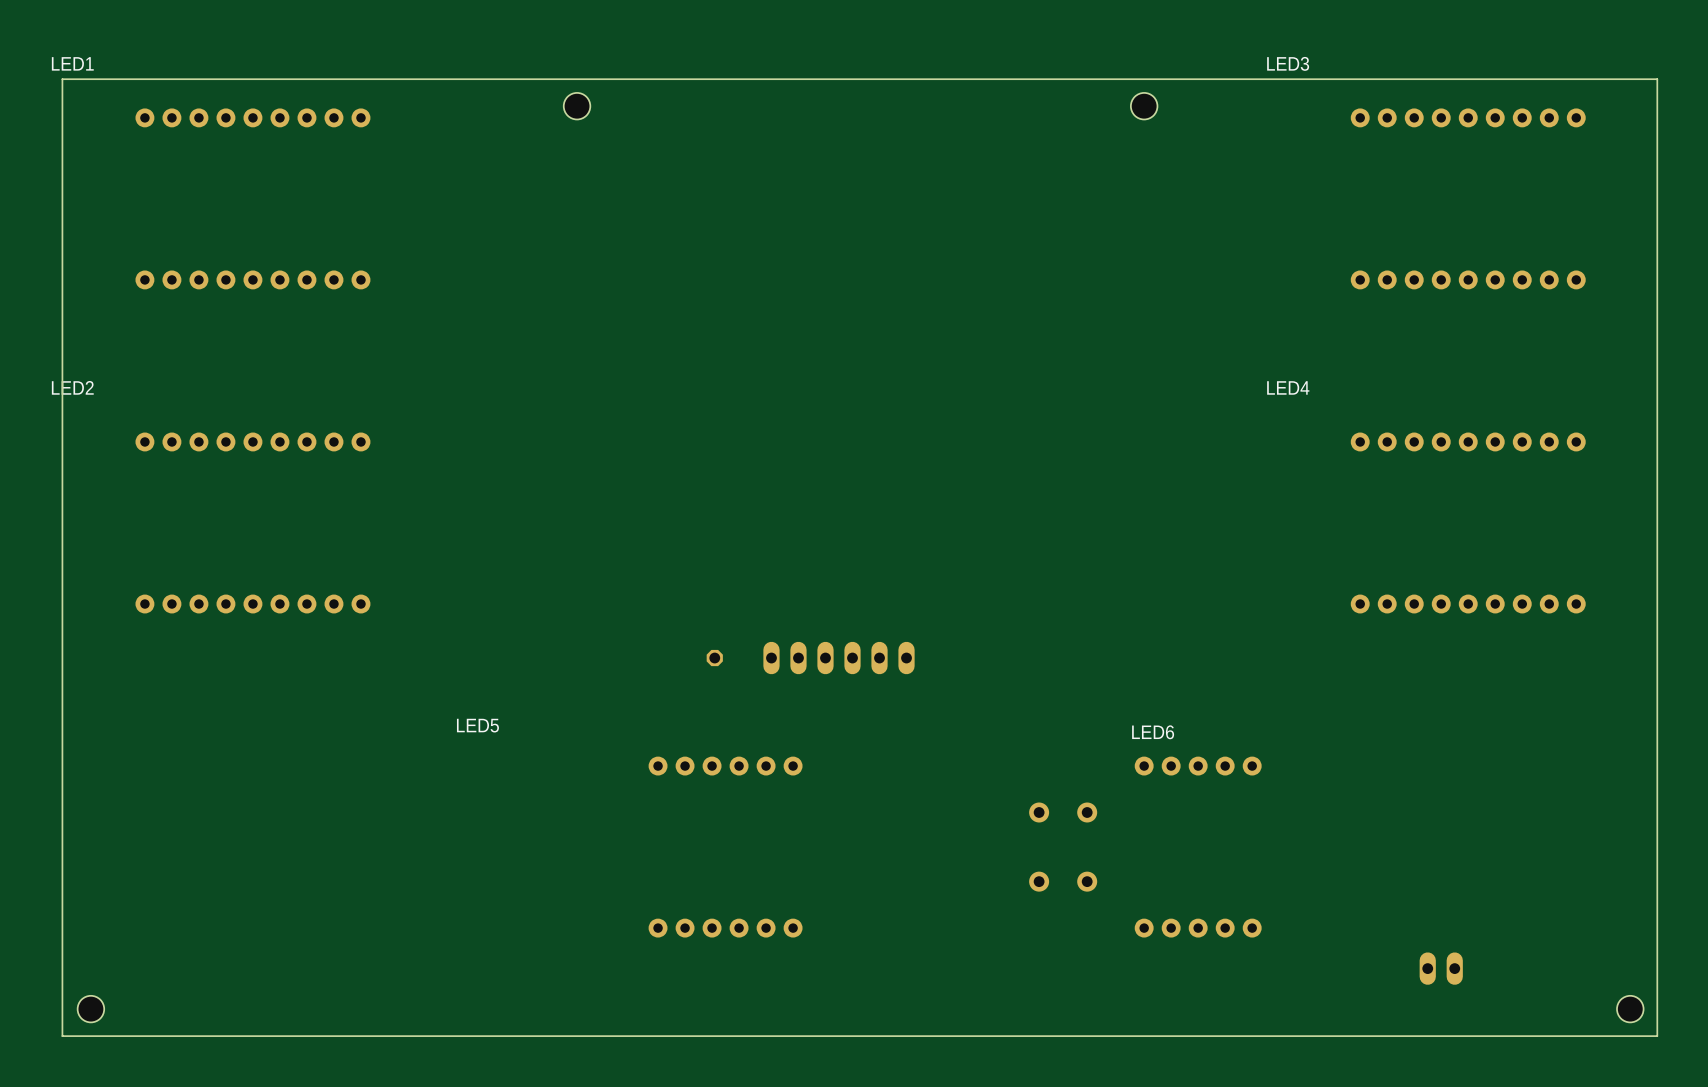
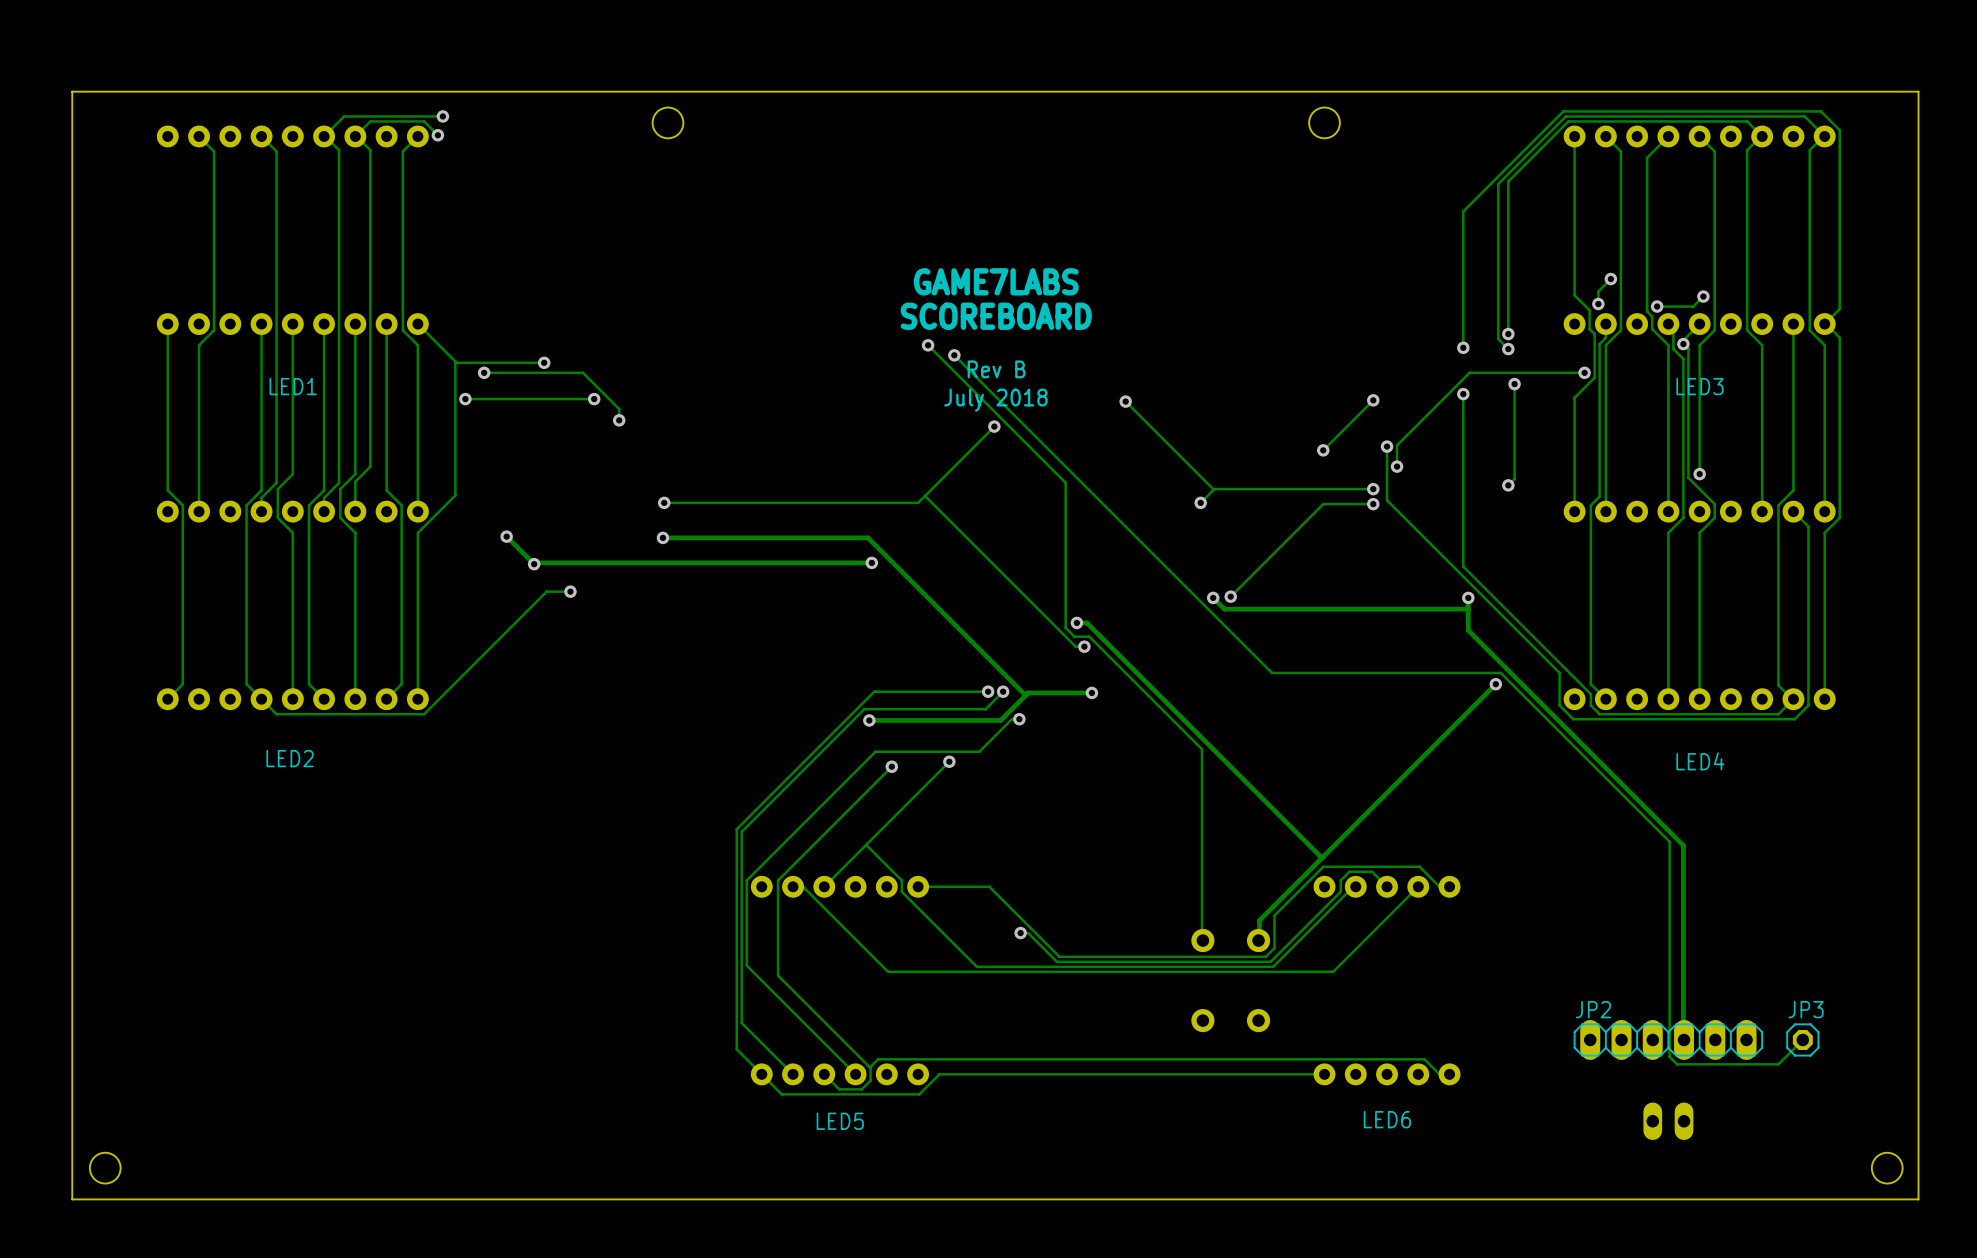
LED1 name position: LED1 (72, 63) -> LED1 (293, 386)
LED3 name position: LED3 (1288, 63) -> LED3 (1699, 386)
track: none -> (442, 116) (344, 116) (324, 136) (339, 150) (339, 482) (324, 497) (324, 511)
via: none -> (442, 116)
track: none -> (437, 135) (424, 121) (370, 121) (355, 136) (370, 150) (370, 466) (355, 481) (355, 511)
via: none -> (437, 135)
track: none -> (199, 136) (214, 151) (214, 330) (199, 345) (199, 511)
track: none -> (261, 136) (276, 151) (276, 482) (261, 497) (261, 511)
track: none -> (417, 136) (402, 151) (402, 330) (417, 345) (417, 511)
track: none -> (1574, 136) (1574, 295) (1589, 310) (1589, 329) (1594, 334) (1594, 377) (1574, 397) (1574, 511)
track: none -> (1605, 136) (1620, 151) (1620, 330) (1605, 345) (1605, 511)
track: none -> (1668, 136) (1647, 157) (1647, 311) (1652, 316) (1652, 329) (1668, 345) (1668, 511)
track: none -> (1699, 136) (1714, 151) (1714, 330) (1699, 345) (1699, 474)
track: none -> (1610, 279) (1598, 291) (1598, 304)
via: none -> (1610, 279)
text: none -> GAME7LABS (996, 281)
track: none -> (1703, 296) (1693, 306) (1657, 306)
via: none -> (1703, 296)
via: none -> (1598, 304)
via: none -> (1657, 306)
text: none -> SCOREBOARD (996, 316)
track: none -> (167, 324) (167, 490) (182, 505) (182, 684) (167, 699)
track: none -> (261, 324) (261, 490) (246, 505) (246, 684) (276, 714) (424, 714) (546, 591) (570, 591)
track: none -> (292, 324) (292, 474) (277, 489) (277, 517) (292, 532) (292, 699)
track: none -> (324, 324) (324, 490) (309, 505) (309, 684) (324, 699)
track: none -> (355, 324) (355, 474) (340, 489) (340, 517) (355, 532) (355, 699)
track: none -> (386, 324) (386, 490) (401, 505) (401, 684) (386, 699)
track: none -> (417, 324) (456, 362) (544, 362)
track: none -> (1605, 324) (1605, 337) (1599, 344) (1599, 496) (1590, 505) (1590, 684) (1605, 699)
track: none -> (1668, 324) (1673, 329) (1673, 349) (1683, 359) (1683, 517) (1668, 532) (1668, 699)
track: none -> (1699, 324) (1683, 340) (1683, 344) (1688, 349) (1688, 477) (1714, 504) (1714, 517) (1699, 532) (1699, 699)
track: none -> (1793, 324) (1793, 490) (1778, 505) (1778, 685) (1793, 699) (1778, 714) (1599, 714) (1590, 705) (1590, 694) (1463, 566) (1463, 394)
track: none -> (1508, 334) (1508, 181) (1568, 121) (1747, 121) (1762, 136) (1747, 150) (1747, 330) (1762, 345) (1762, 511)
via: none -> (1508, 334)
via: none -> (1683, 344)
track: none -> (928, 345) (1065, 482) (1065, 627) (1074, 636) (1089, 636) (1201, 749) (1202, 940)
via: none -> (928, 345)
track: none -> (1463, 347) (1463, 211) (1563, 111) (1820, 111) (1839, 130) (1839, 309) (1824, 324) (1839, 337) (1839, 517) (1824, 532) (1824, 699)
via: none -> (1463, 347)
track: none -> (1508, 349) (1498, 339) (1498, 183) (1565, 116) (1804, 116) (1824, 136) (1809, 150) (1809, 330) (1824, 345) (1824, 511)
via: none -> (1508, 349)
track: none -> (954, 355) (1271, 672) (1500, 672) (1669, 841) (1669, 1056) (1677, 1064) (1778, 1064) (1802, 1039)
via: none -> (954, 355)
track: none -> (456, 362) (455, 495) (417, 532) (417, 699)
via: none -> (544, 362)
text: none -> Rev B (996, 369)
track: none -> (484, 372) (582, 372) (619, 409) (619, 420)
via: none -> (484, 372)
track: none -> (1584, 372) (1469, 372) (1397, 445) (1397, 466)
via: none -> (1584, 372)
track: none -> (1514, 384) (1514, 479) (1508, 485)
via: none -> (1514, 384)
via: none -> (1463, 394)
via: none -> (465, 399)
track: none -> (594, 399) (465, 399)
via: none -> (594, 399)
text: none -> July 2018 (995, 400)
track: none -> (1373, 400) (1323, 450)
via: none -> (1373, 400)
track: none -> (1125, 401) (1213, 489)
via: none -> (1125, 401)
via: none -> (619, 420)
track: none -> (994, 426) (918, 502) (664, 502)
via: none -> (994, 426)
track: none -> (1387, 446) (1387, 500) (1559, 672) (1559, 705) (1573, 719) (1794, 719) (1808, 705) (1808, 526) (1793, 511)
via: none -> (1387, 446)
LED2 name position: LED2 (72, 387) -> LED2 (290, 758)
LED4 name position: LED4 (1288, 387) -> LED4 (1700, 761)
via: none -> (1323, 450)
via: none -> (1397, 466)
via: none -> (1699, 474)
via: none -> (1508, 485)
track: none -> (1373, 489) (1214, 489) (1200, 502)
via: none -> (1373, 489)
track: none -> (924, 496) (1075, 646) (1084, 646)
via: none -> (664, 502)
via: none -> (1200, 502)
track: none -> (1373, 504) (1323, 504) (1230, 596)
via: none -> (1373, 504)
track: none -> (506, 536) (534, 564) (871, 562)
via: none -> (506, 536)
track: none -> (662, 537) (868, 537) (1025, 695)
via: none -> (662, 537)
via: none -> (871, 562)
via: none -> (534, 564)
via: none -> (570, 591)
via: none -> (1230, 596)
track: none -> (1213, 597) (1224, 609) (1468, 609)
via: none -> (1213, 597)
track: none -> (1468, 597) (1468, 630) (1683, 845) (1684, 1039)
via: none -> (1468, 597)
track: none -> (1076, 622) (1086, 622) (1322, 858)
via: none -> (1076, 622)
via: none -> (1084, 646)
track: none -> (1495, 684) (1259, 920) (1258, 940)
via: none -> (1495, 684)
track: none -> (988, 691) (874, 691) (736, 829) (736, 1049) (781, 1094) (919, 1094) (939, 1074) (1324, 1074)
via: none -> (988, 691)
track: none -> (1003, 691) (985, 709) (864, 709) (741, 831) (741, 1023) (793, 1074)
via: none -> (1003, 691)
track: none -> (1091, 692) (1028, 692) (1000, 720) (869, 720)
via: none -> (1091, 692)
track: none -> (1019, 719) (1011, 719) (979, 751) (875, 751) (746, 880) (746, 965) (855, 1074)
via: none -> (1019, 719)
via: none -> (869, 720)
part: (714, 658) -> none
track: none -> (949, 761) (824, 886)
via: none -> (949, 761)
part: (839, 658) -> none
track: none -> (891, 766) (778, 880) (778, 975) (870, 1068) (870, 1080) (861, 1089) (839, 1089) (824, 1074)
via: none -> (891, 766)
LED5 name position: LED5 (477, 725) -> LED5 (840, 1121)
track: none -> (866, 844) (901, 880) (901, 891) (976, 966) (1273, 966) (1353, 886) (1355, 886)
LED6 name position: LED6 (1153, 732) -> LED6 (1387, 1119)
track: none -> (1387, 886) (1372, 871) (1349, 871) (1340, 880) (1340, 891) (1270, 961) (1056, 961) (1028, 933) (1020, 933)
track: none -> (1418, 886) (1333, 971) (888, 971) (803, 886) (793, 886)
track: none -> (1449, 886) (1439, 886) (1419, 866) (1323, 866) (1274, 915) (1274, 948) (1265, 956) (1059, 956) (989, 886) (918, 886)
via: none -> (1020, 933)
JP2: none -> (1668, 1039)
JP3: none -> (1802, 1039)
track: none -> (869, 1067) (878, 1059) (1424, 1059) (1439, 1074) (1449, 1074)

